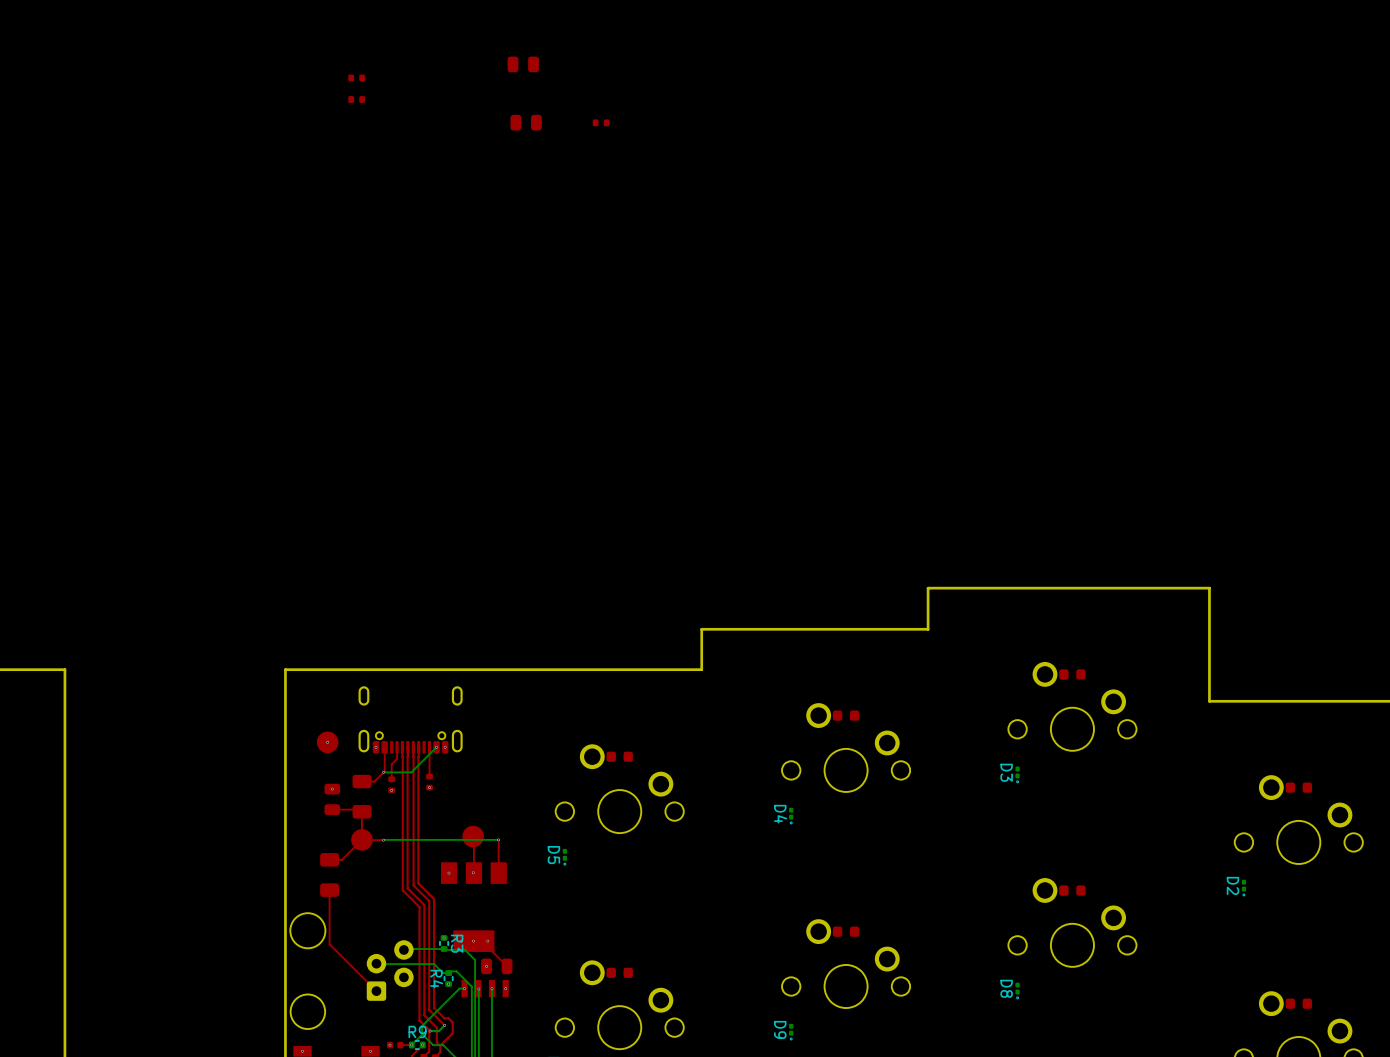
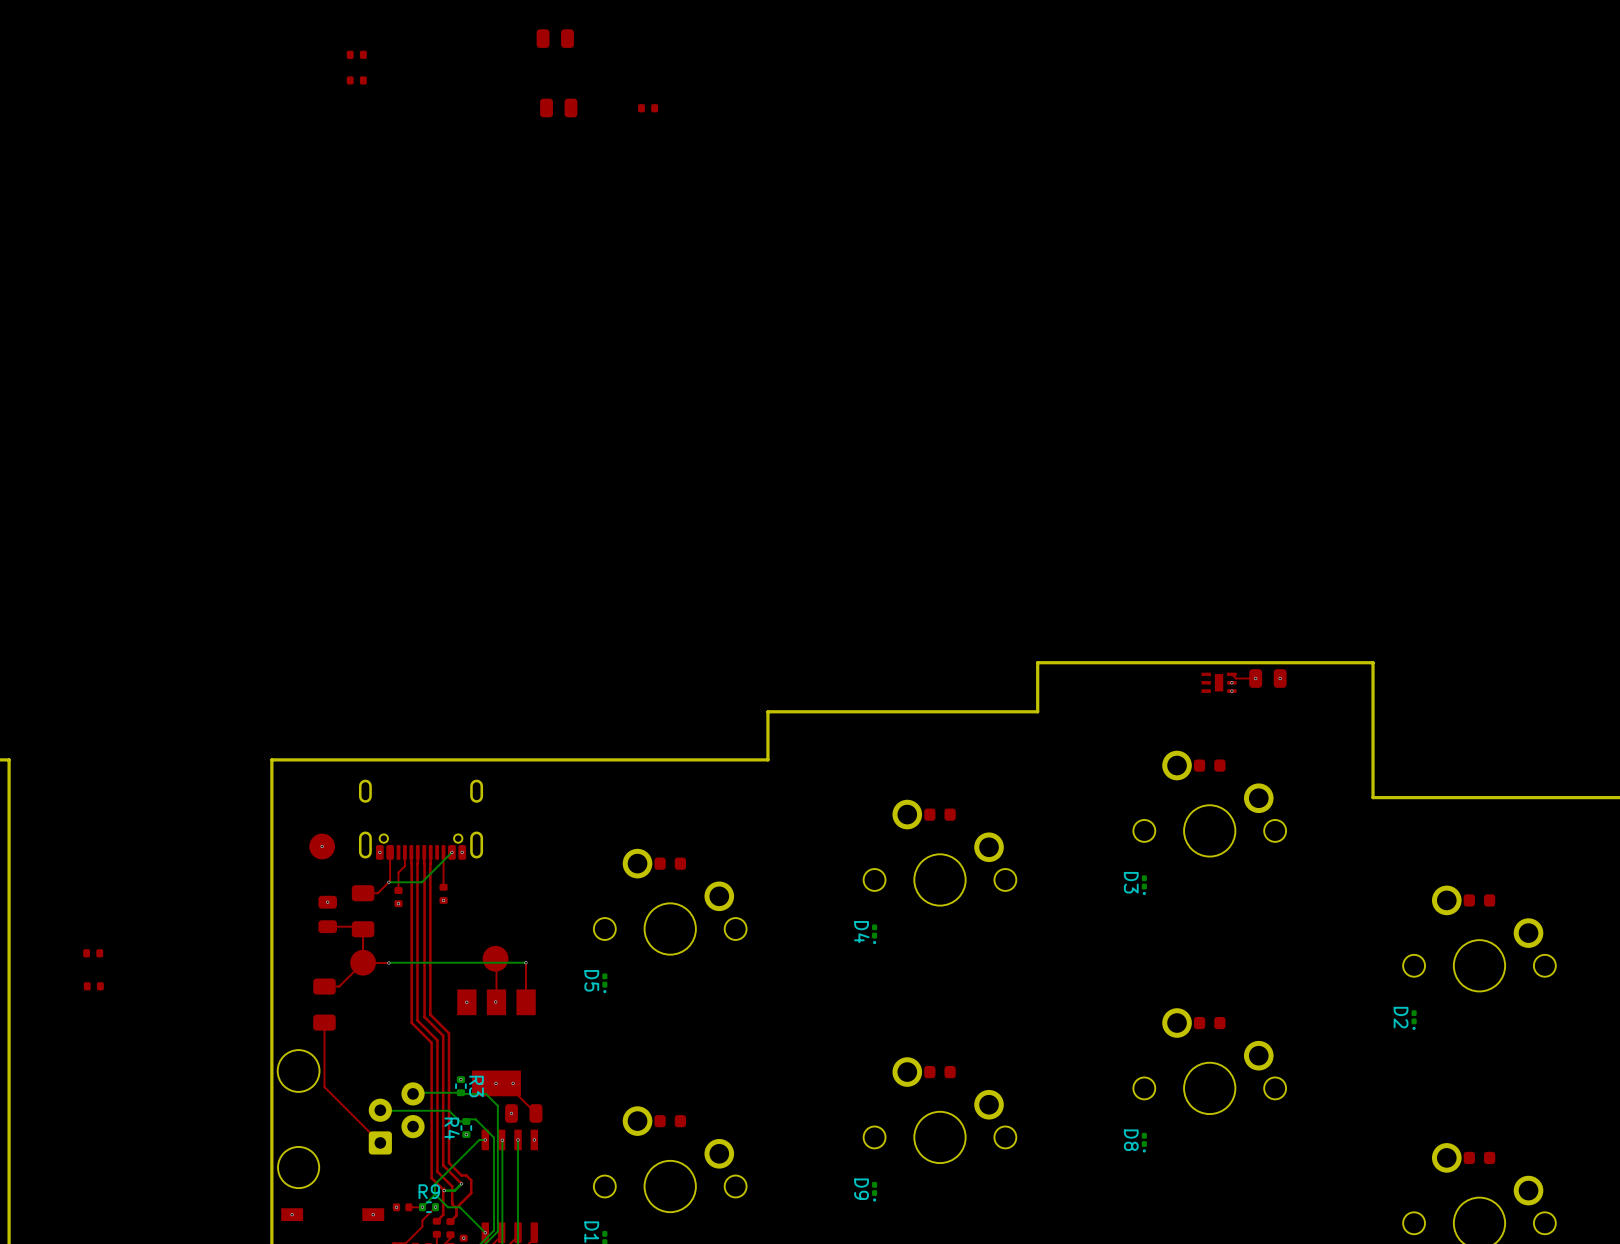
top track: none -> (1231, 674) (1235, 678) (1255, 678)
via: none -> (1255, 678)
part: none -> (1267, 678)
via: none -> (1280, 678)
part: none -> (1219, 682)
via: none -> (1231, 682)
via: none -> (1231, 691)
part: none -> (93, 953)
part: none -> (93, 986)

